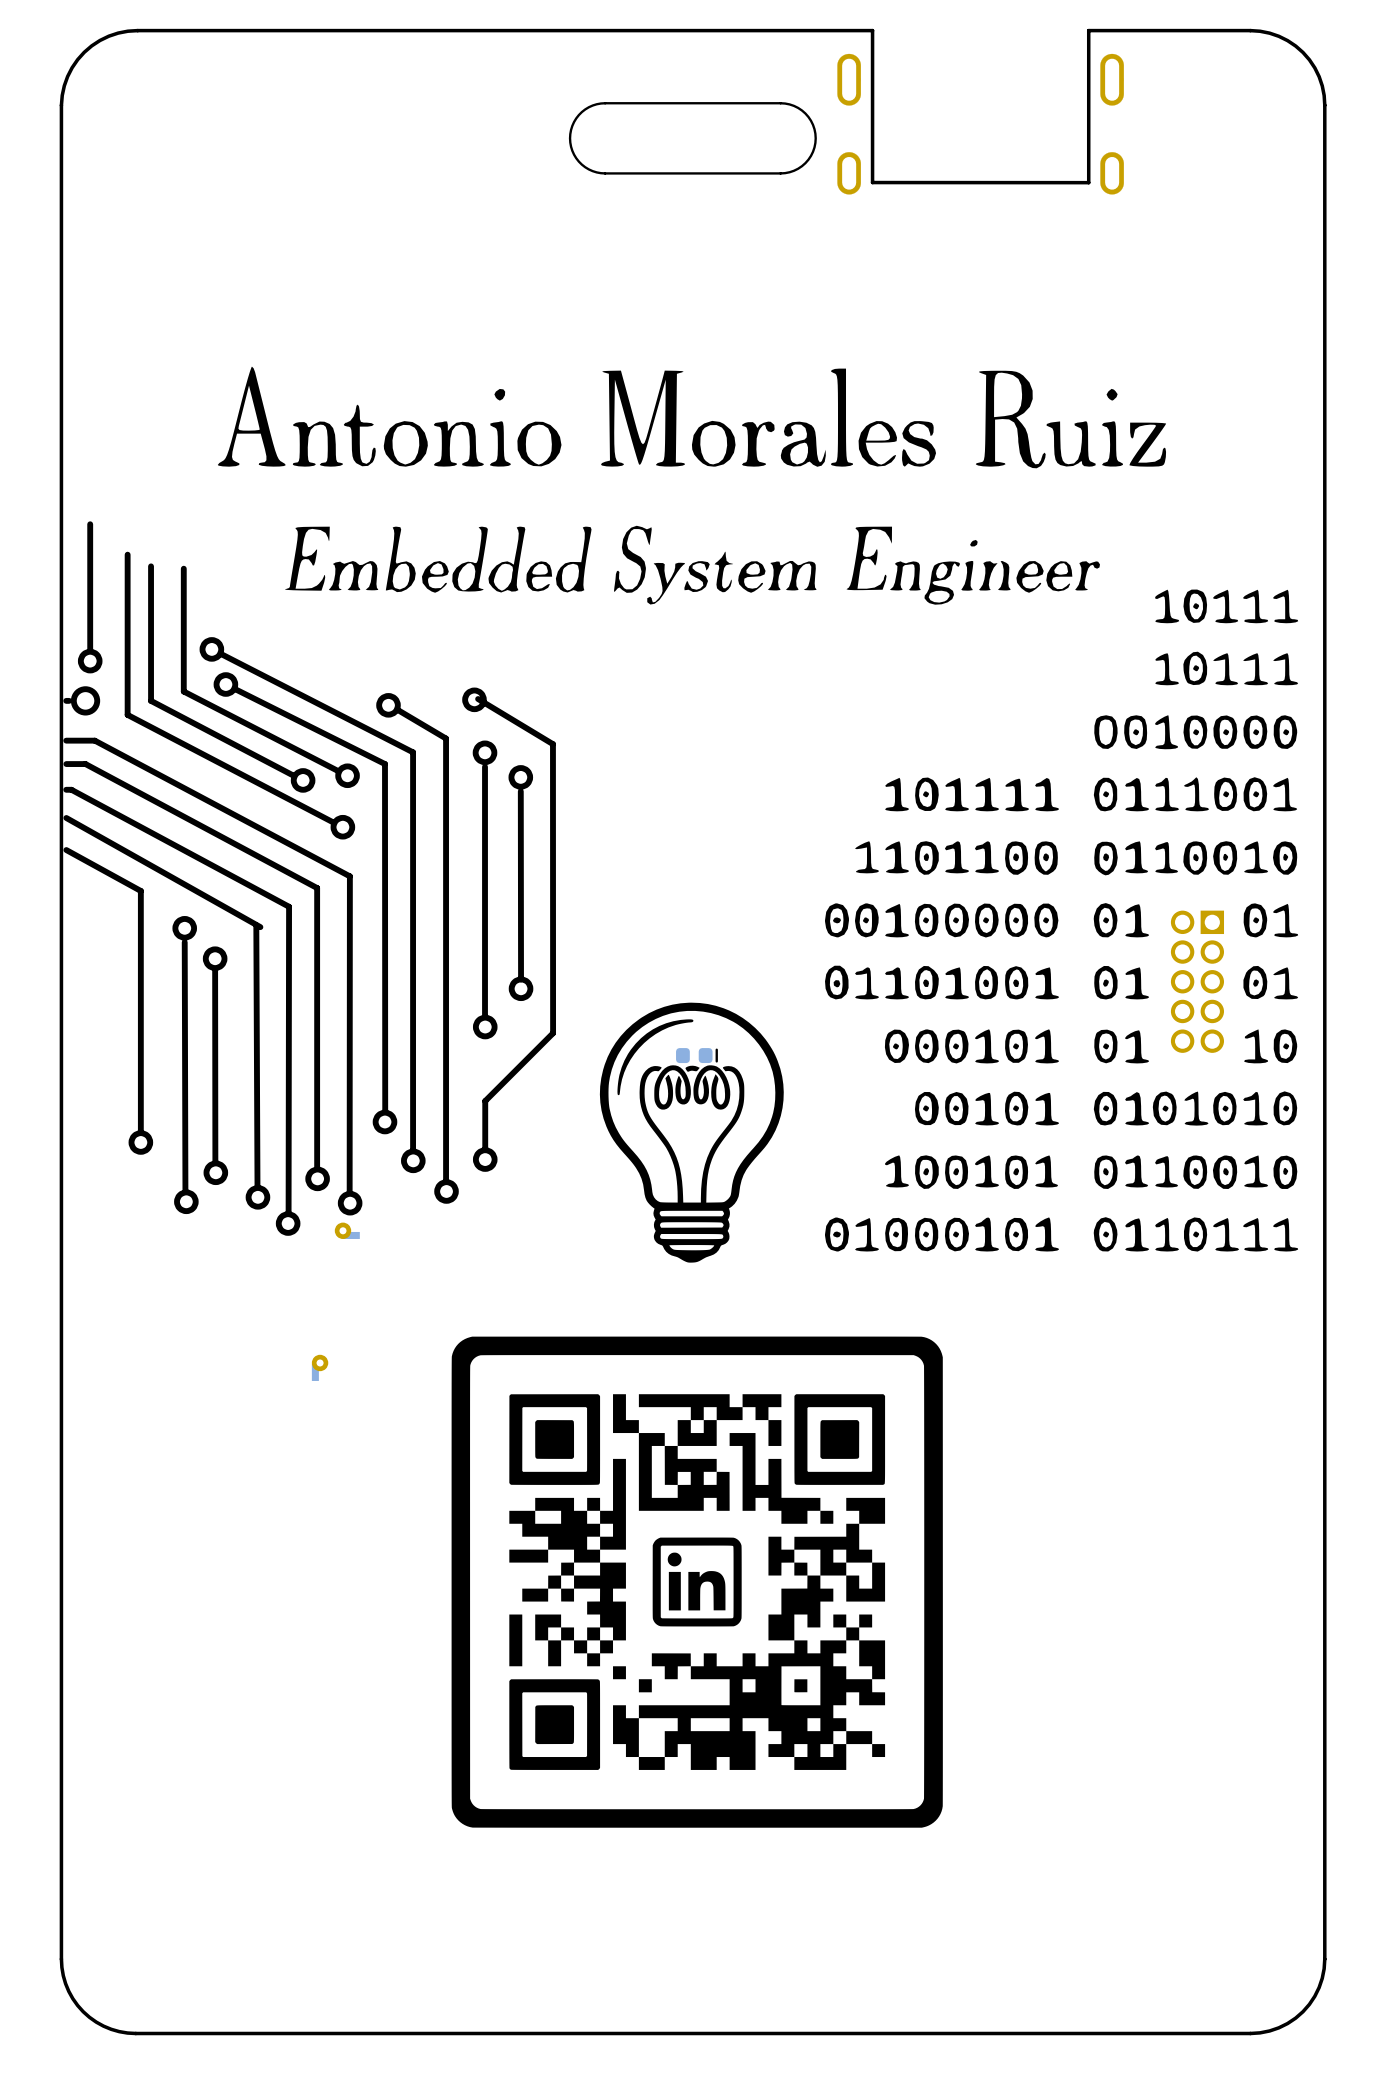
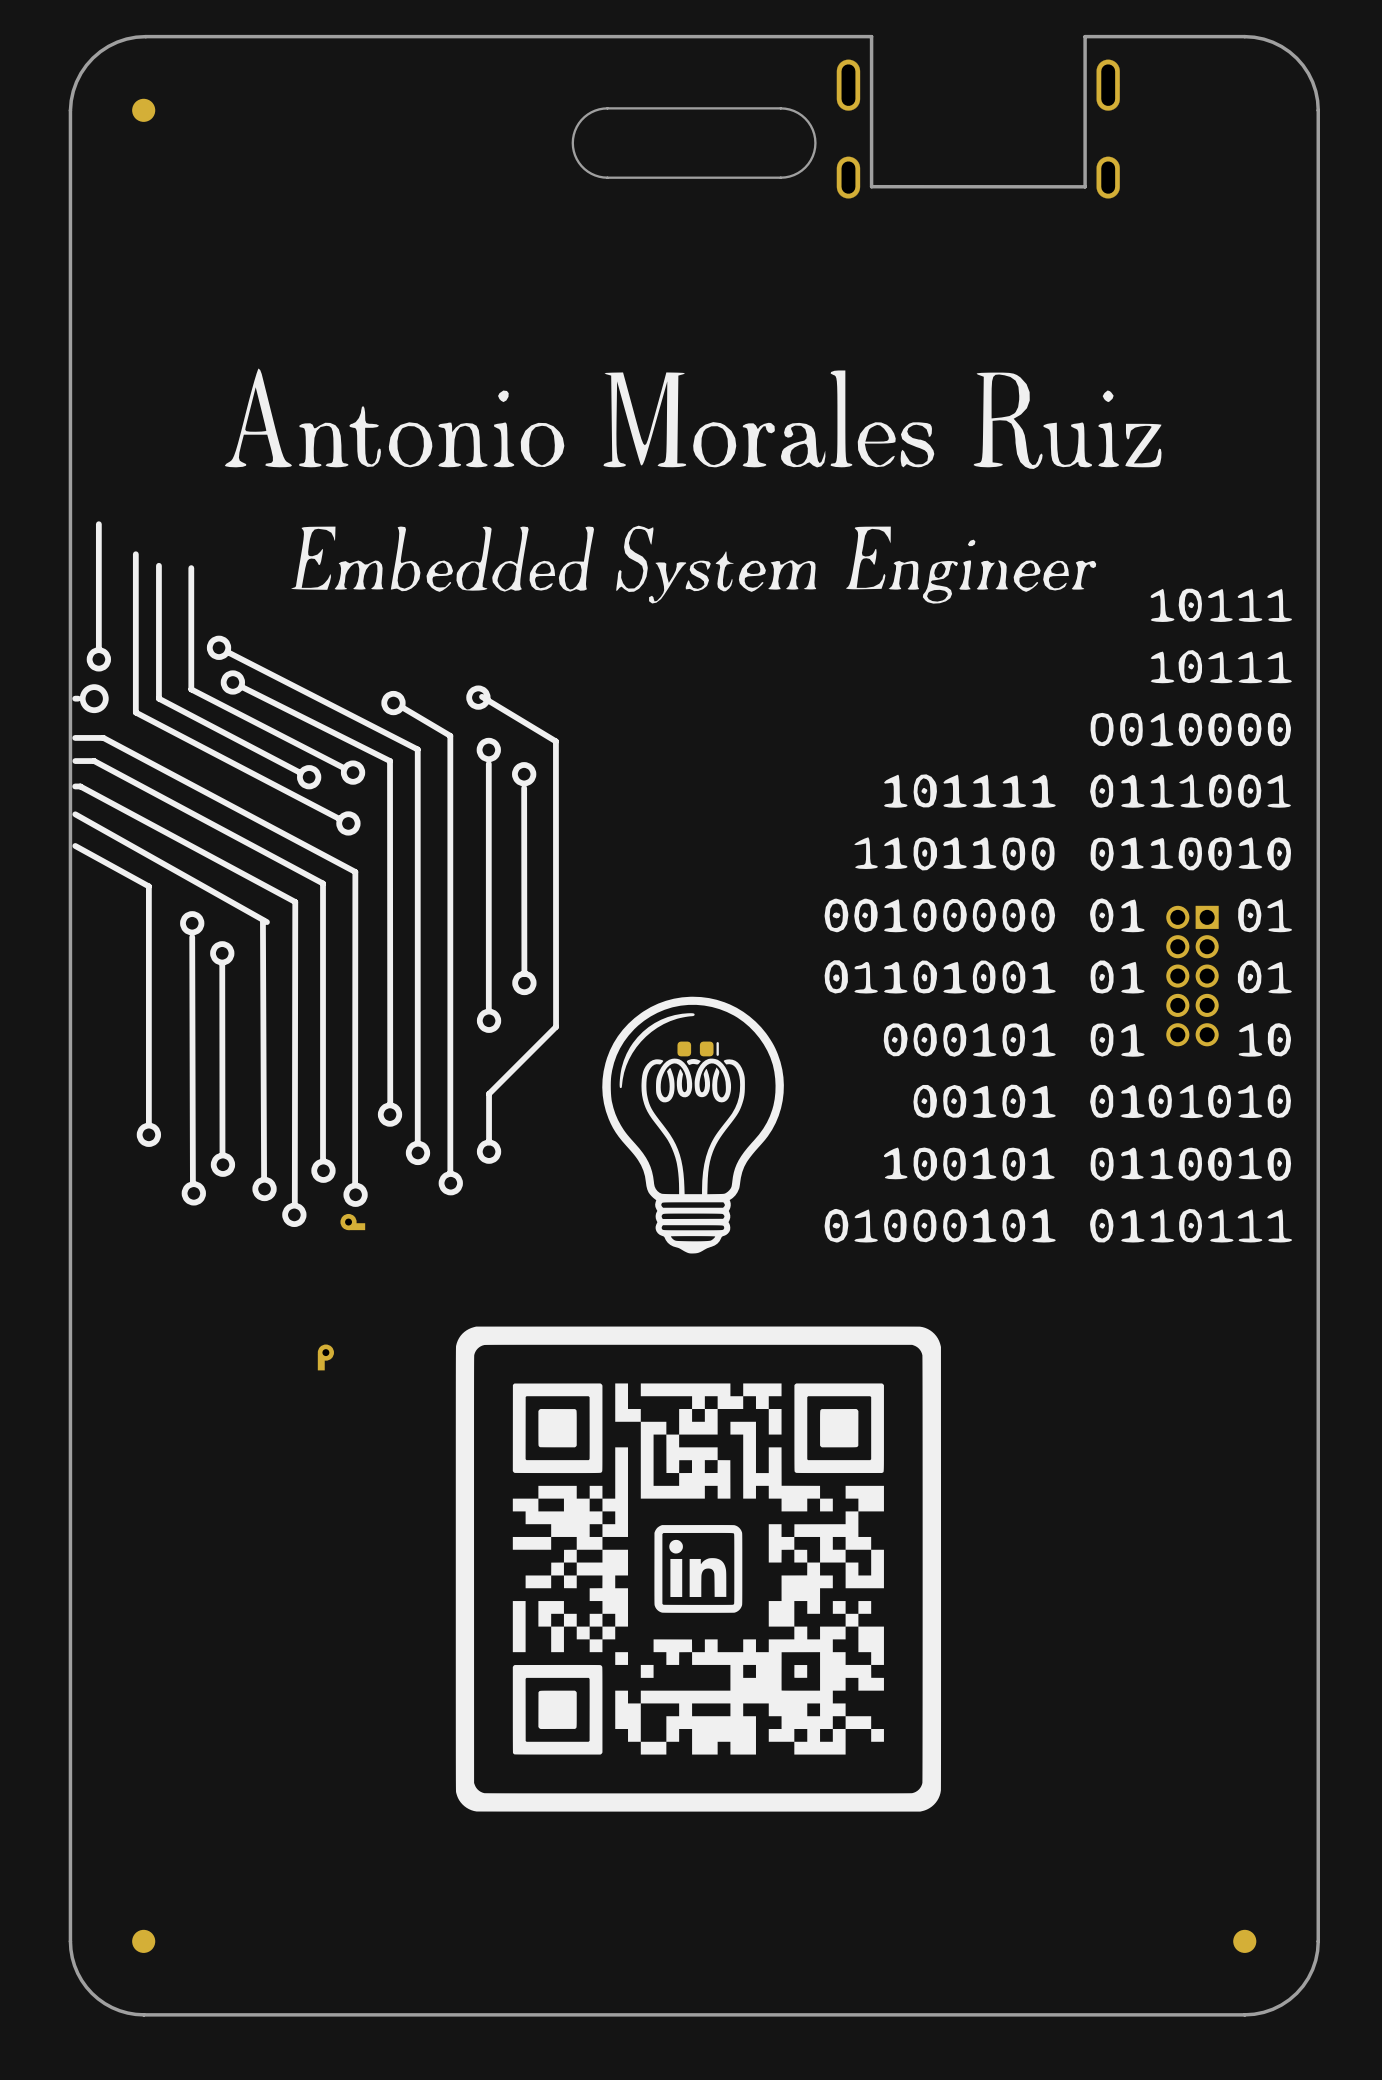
part: none -> (143, 110)
part: none -> (143, 1941)
part: none -> (1244, 1941)

